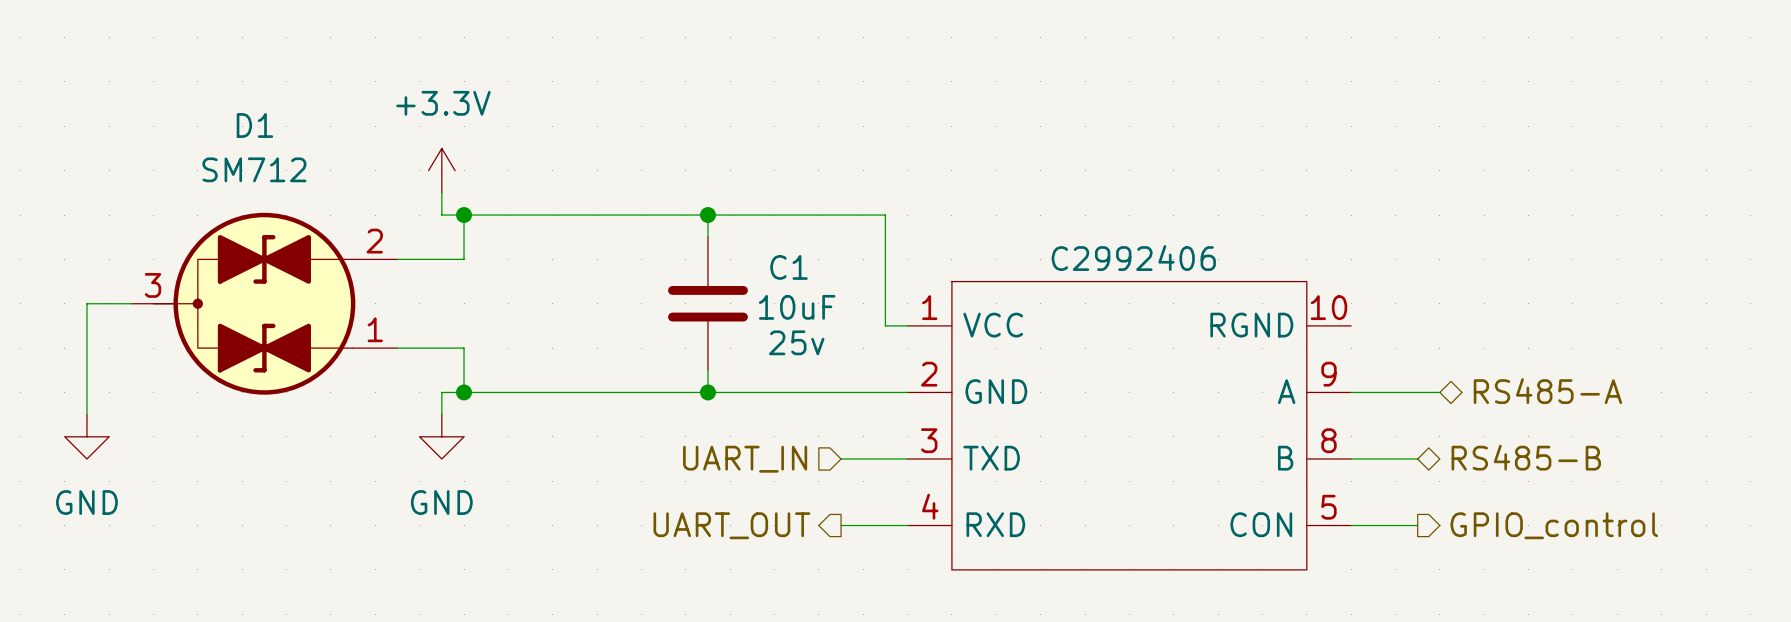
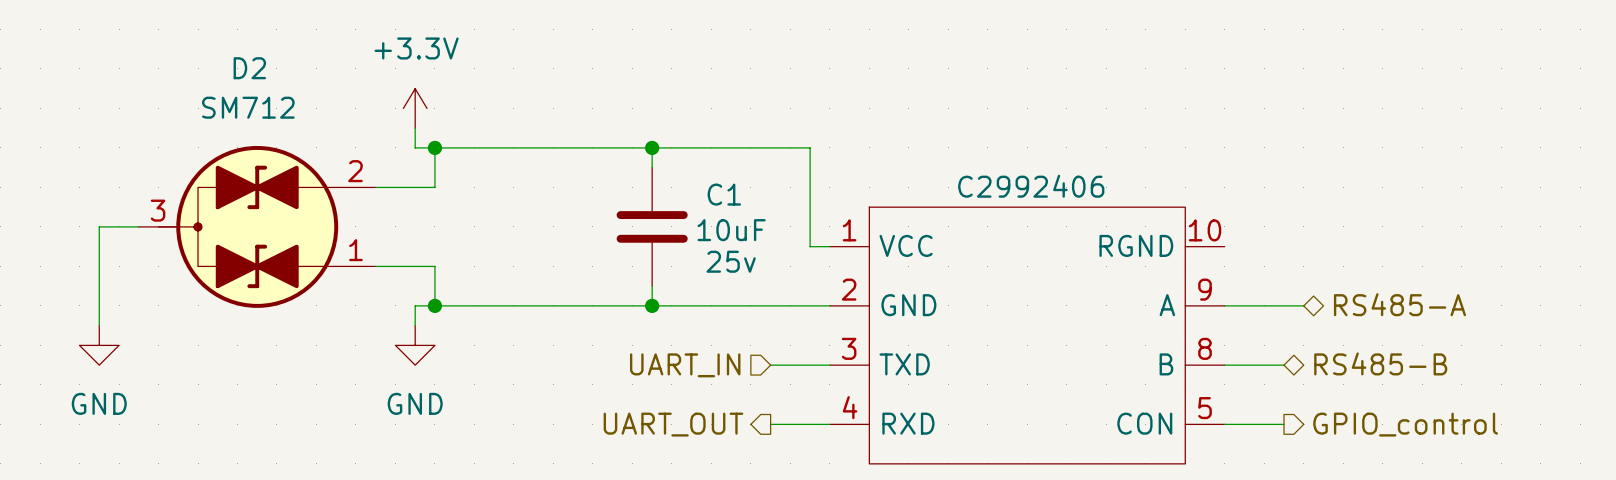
D1 name: D1 (254, 125) -> D2 (249, 68)

